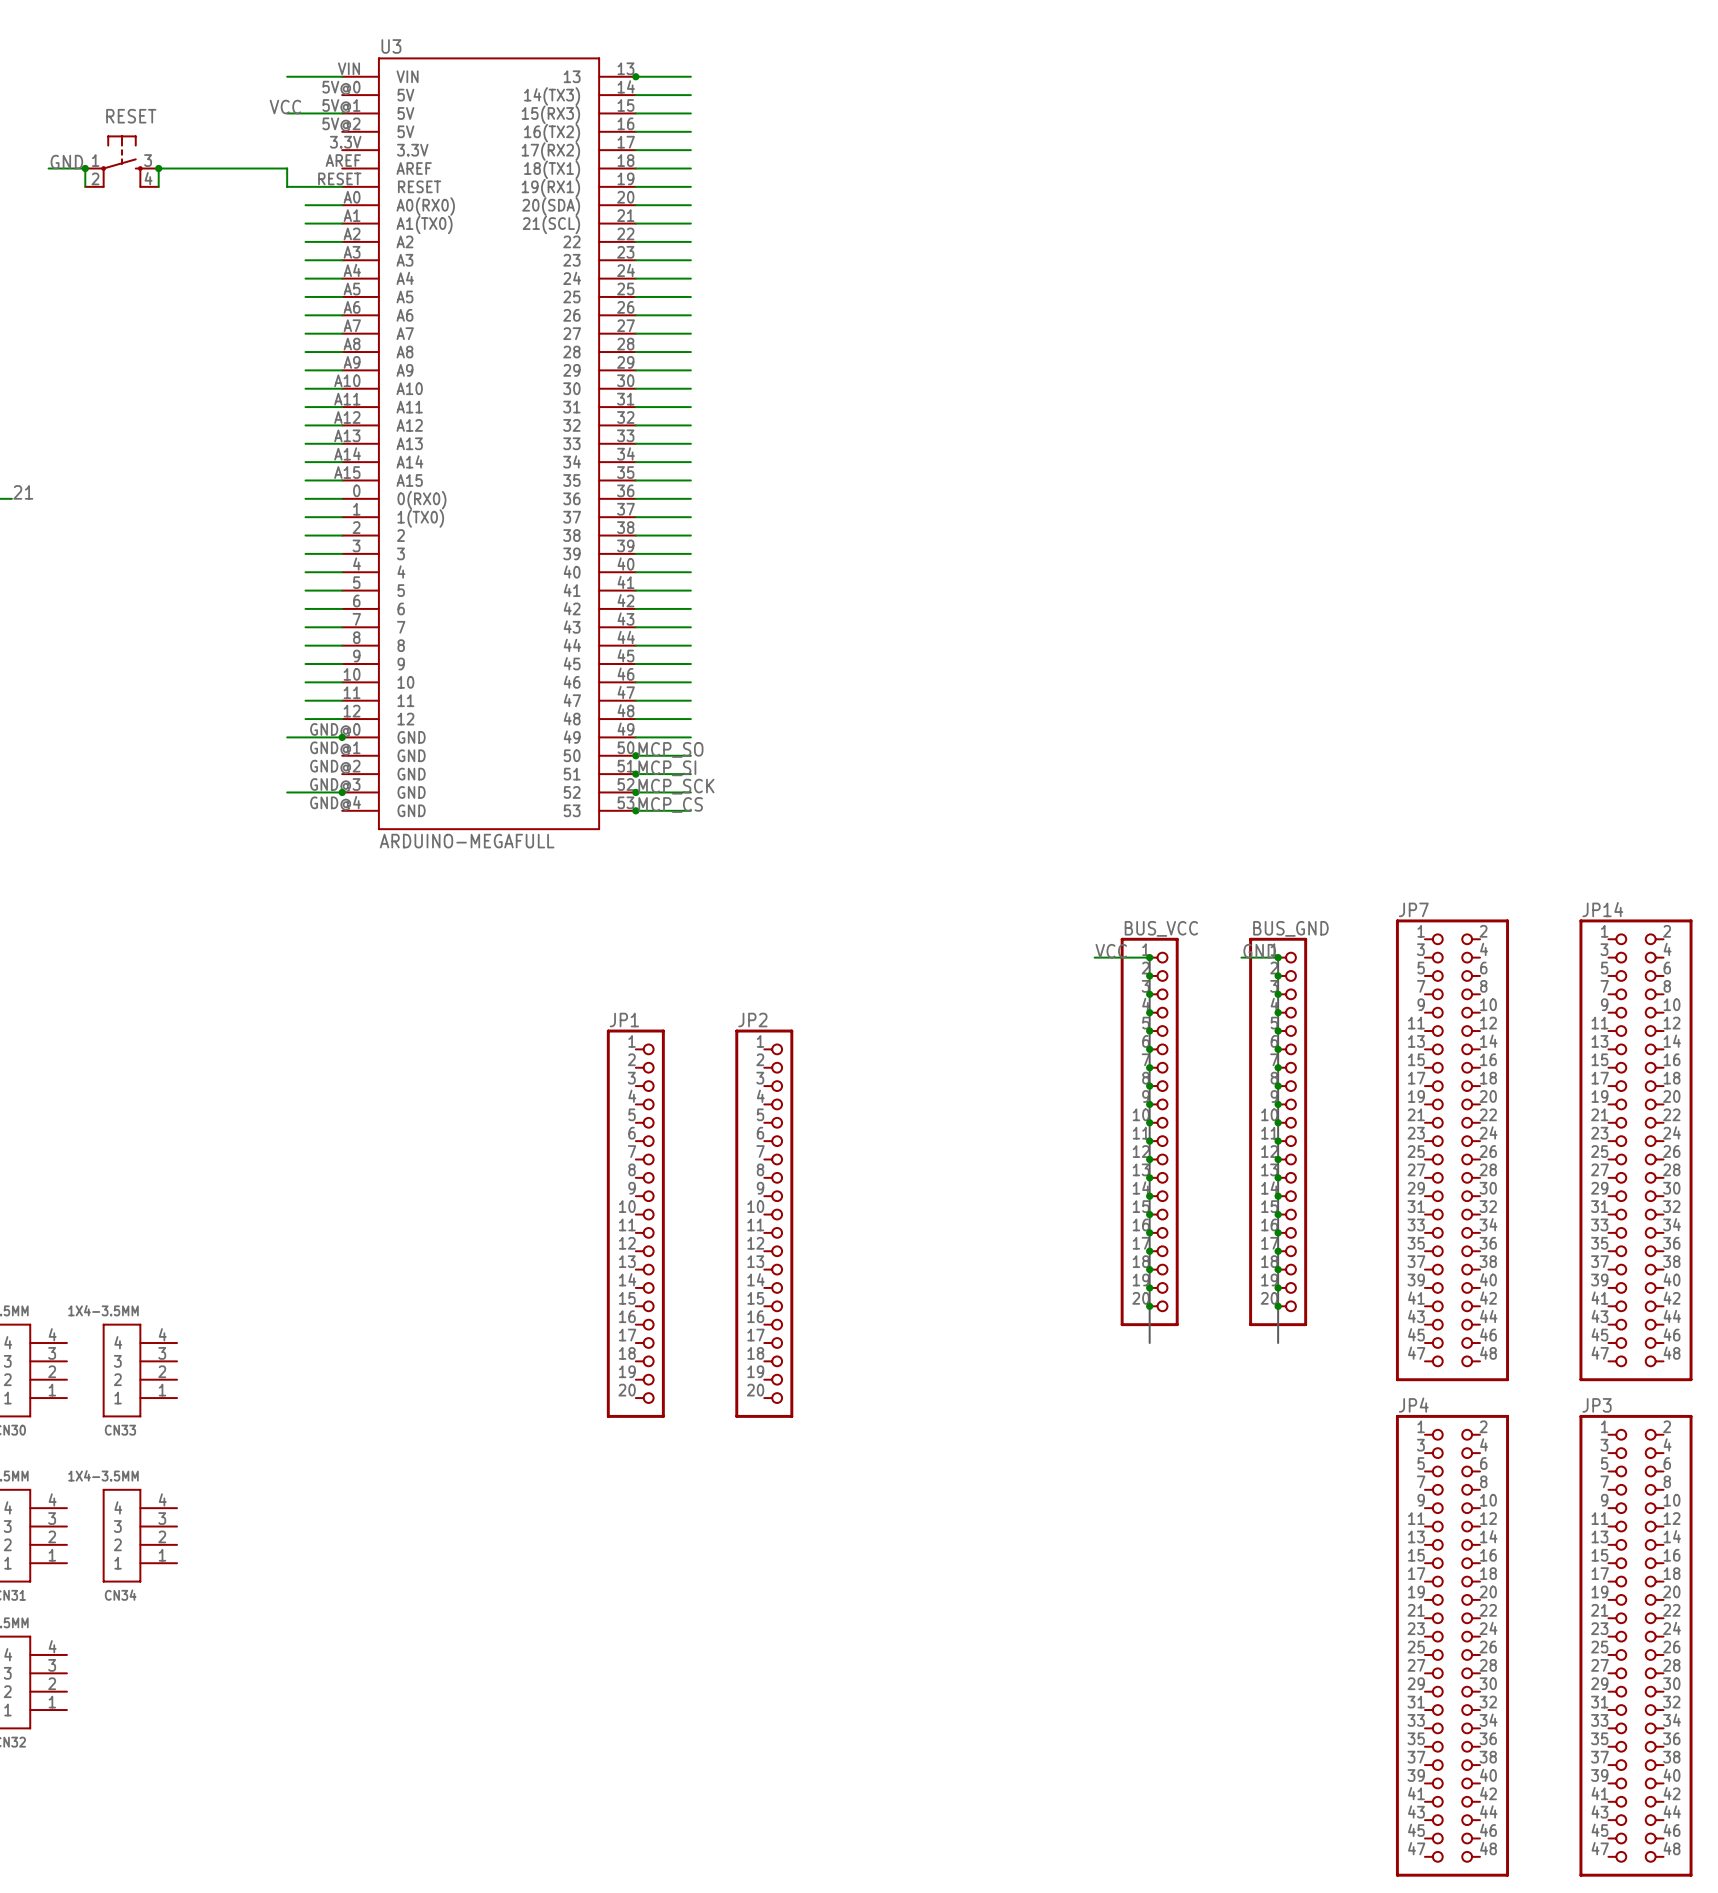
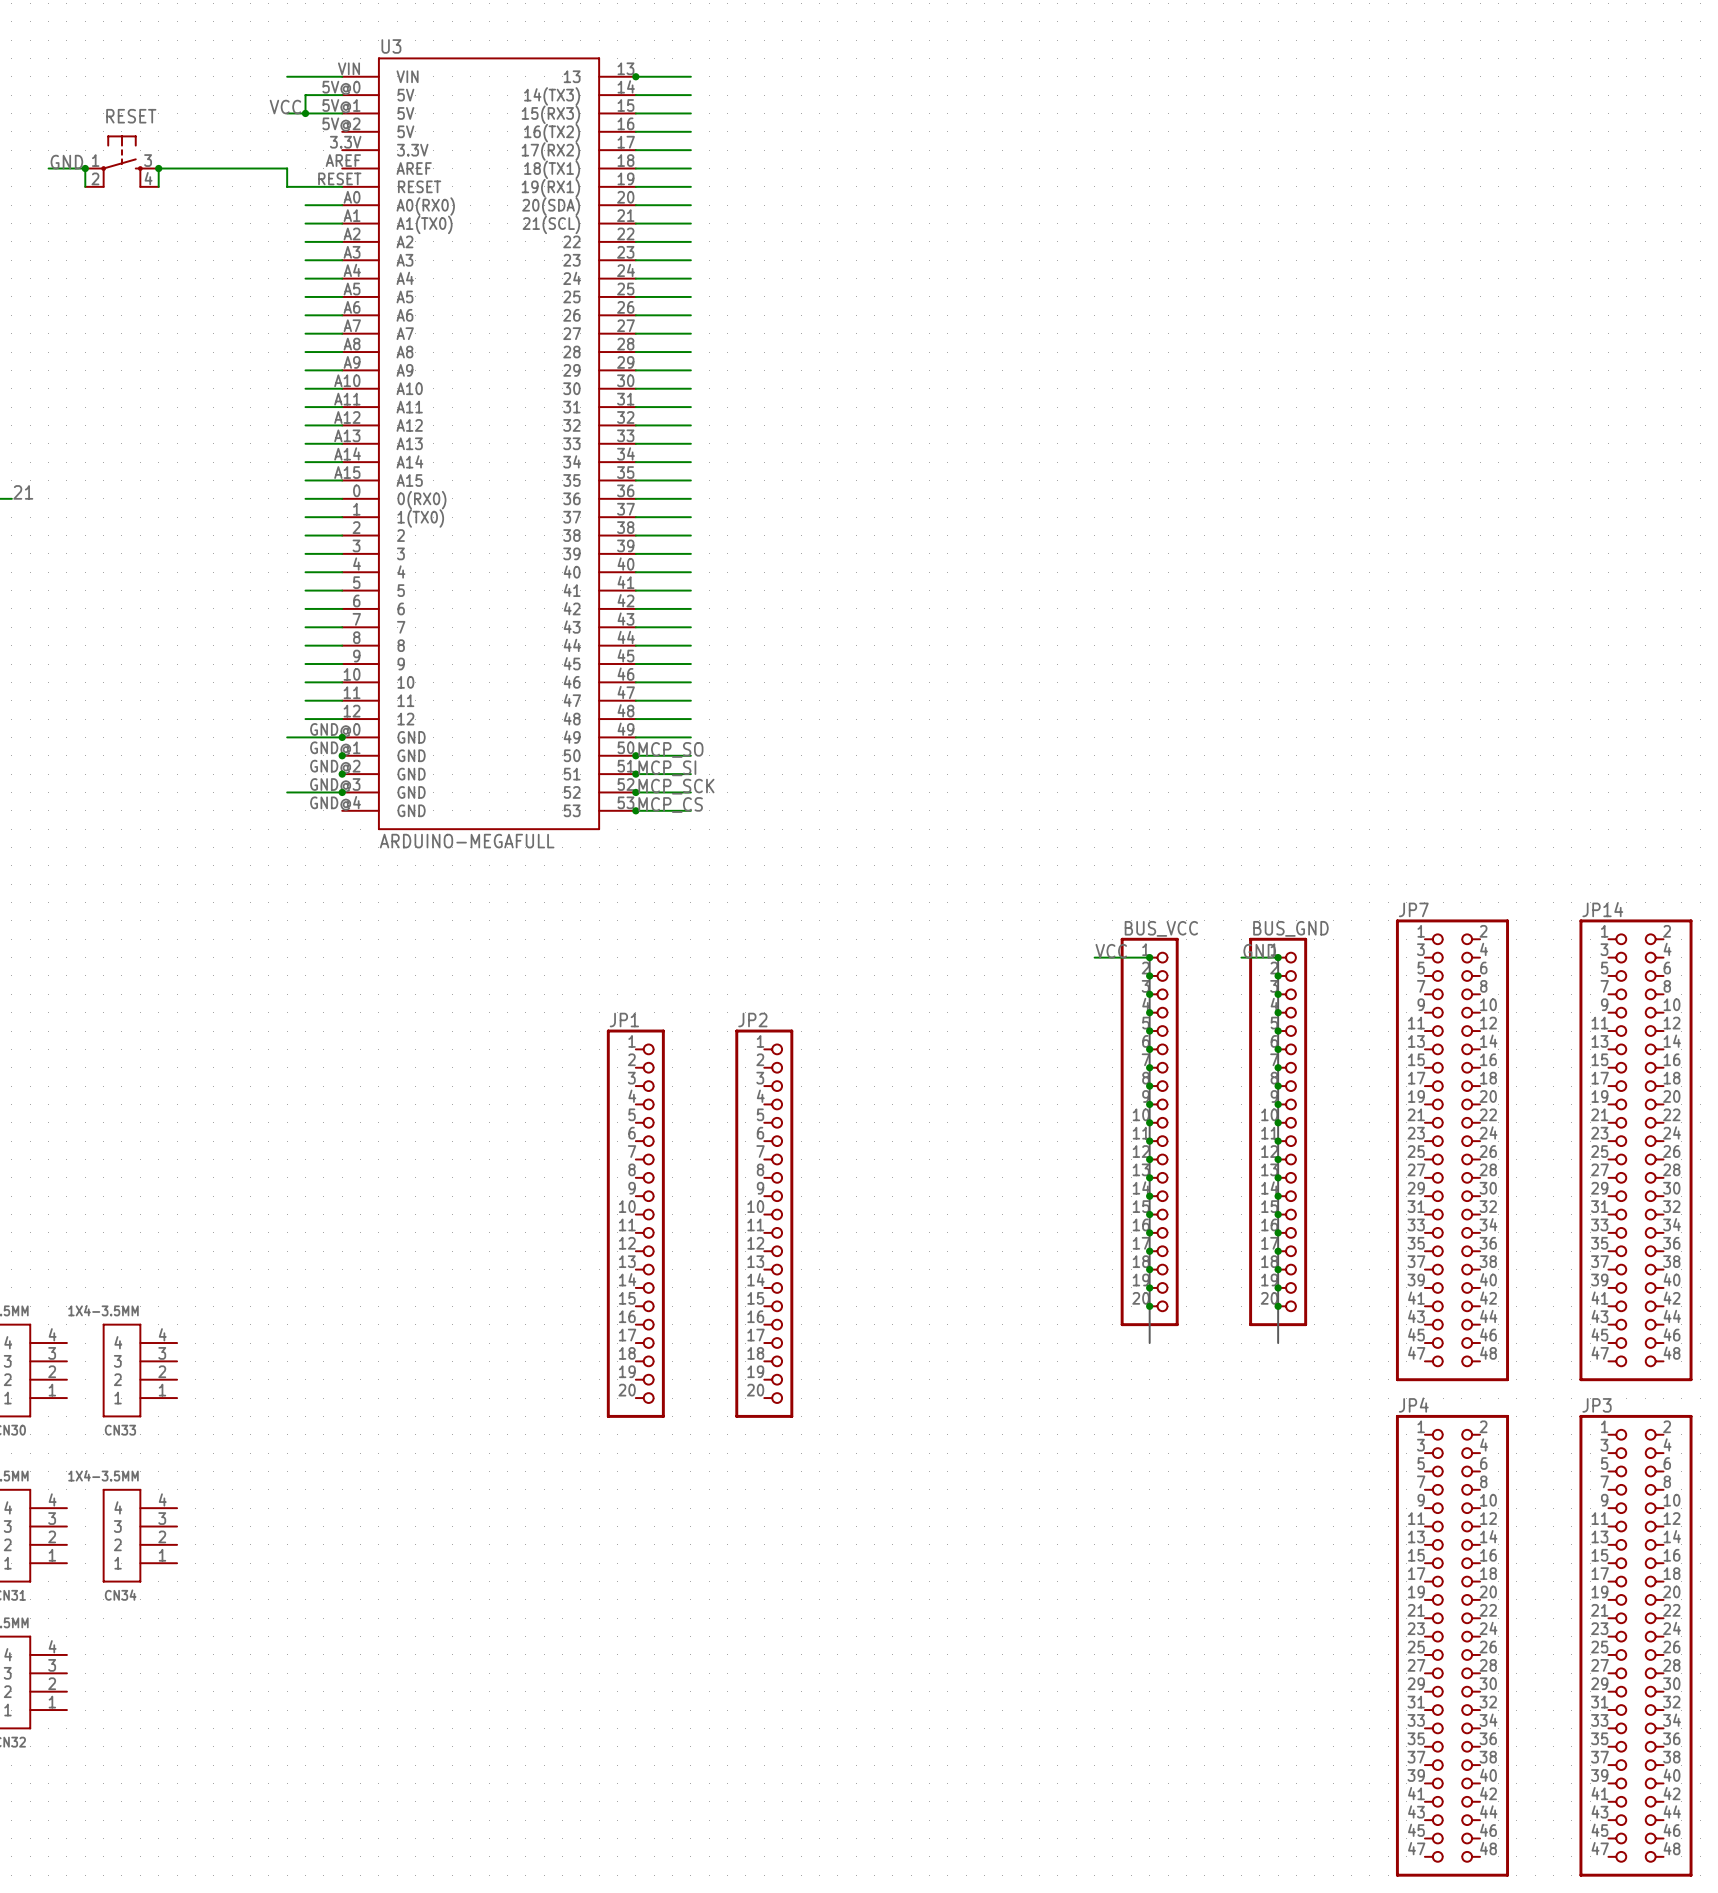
wire: none -> (342, 95) (305, 95) (305, 113)
junction: none -> (305, 113)
junction: none -> (342, 755)
junction: none -> (342, 774)

